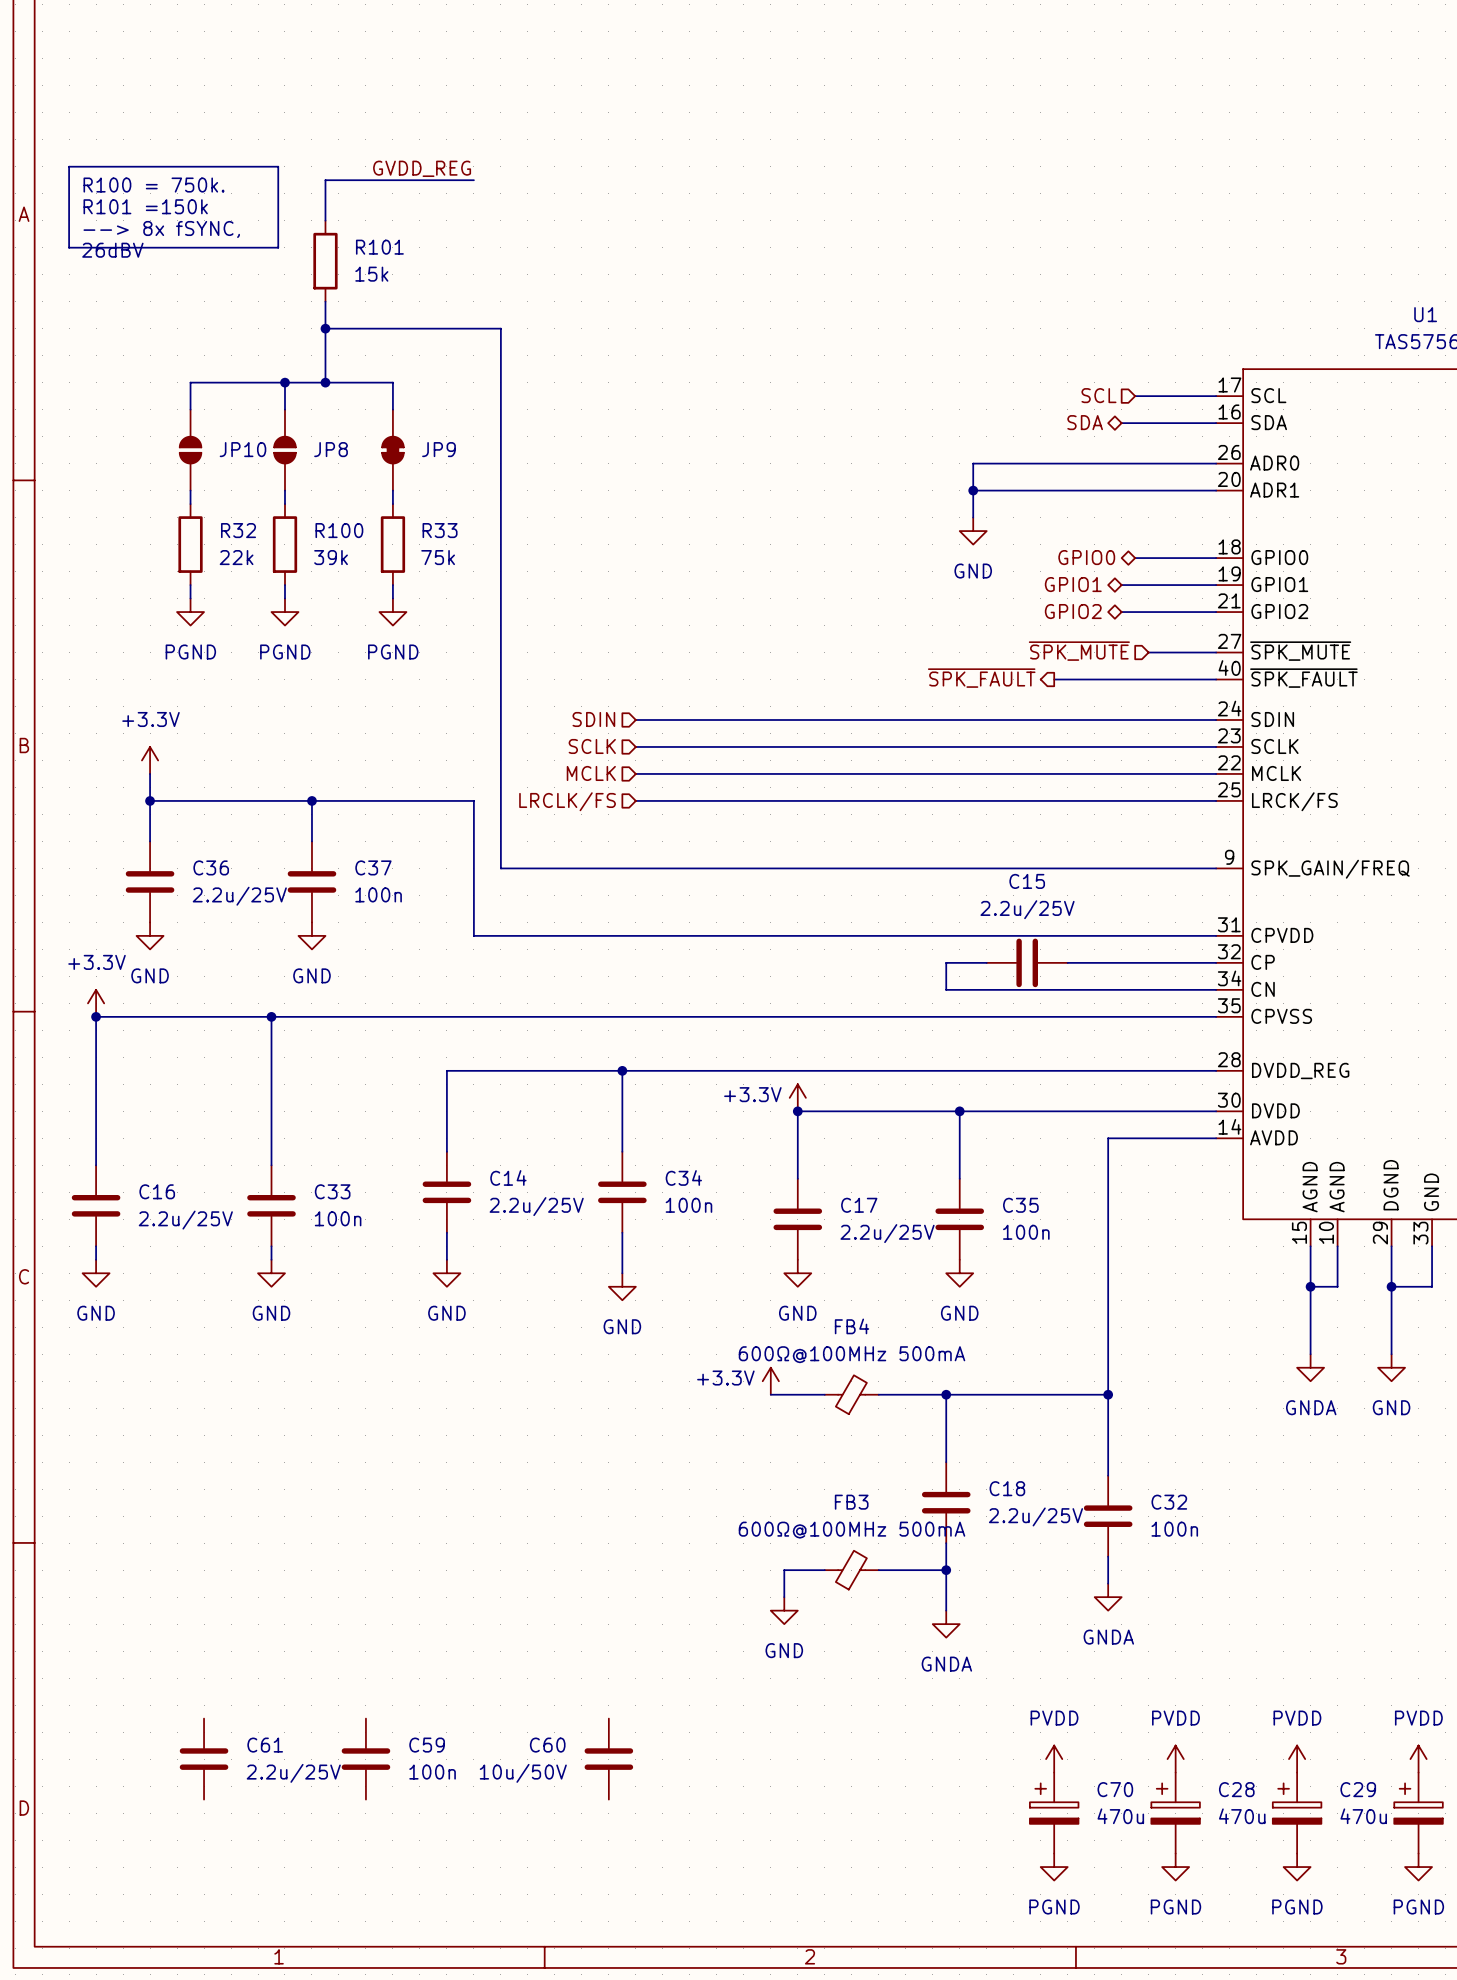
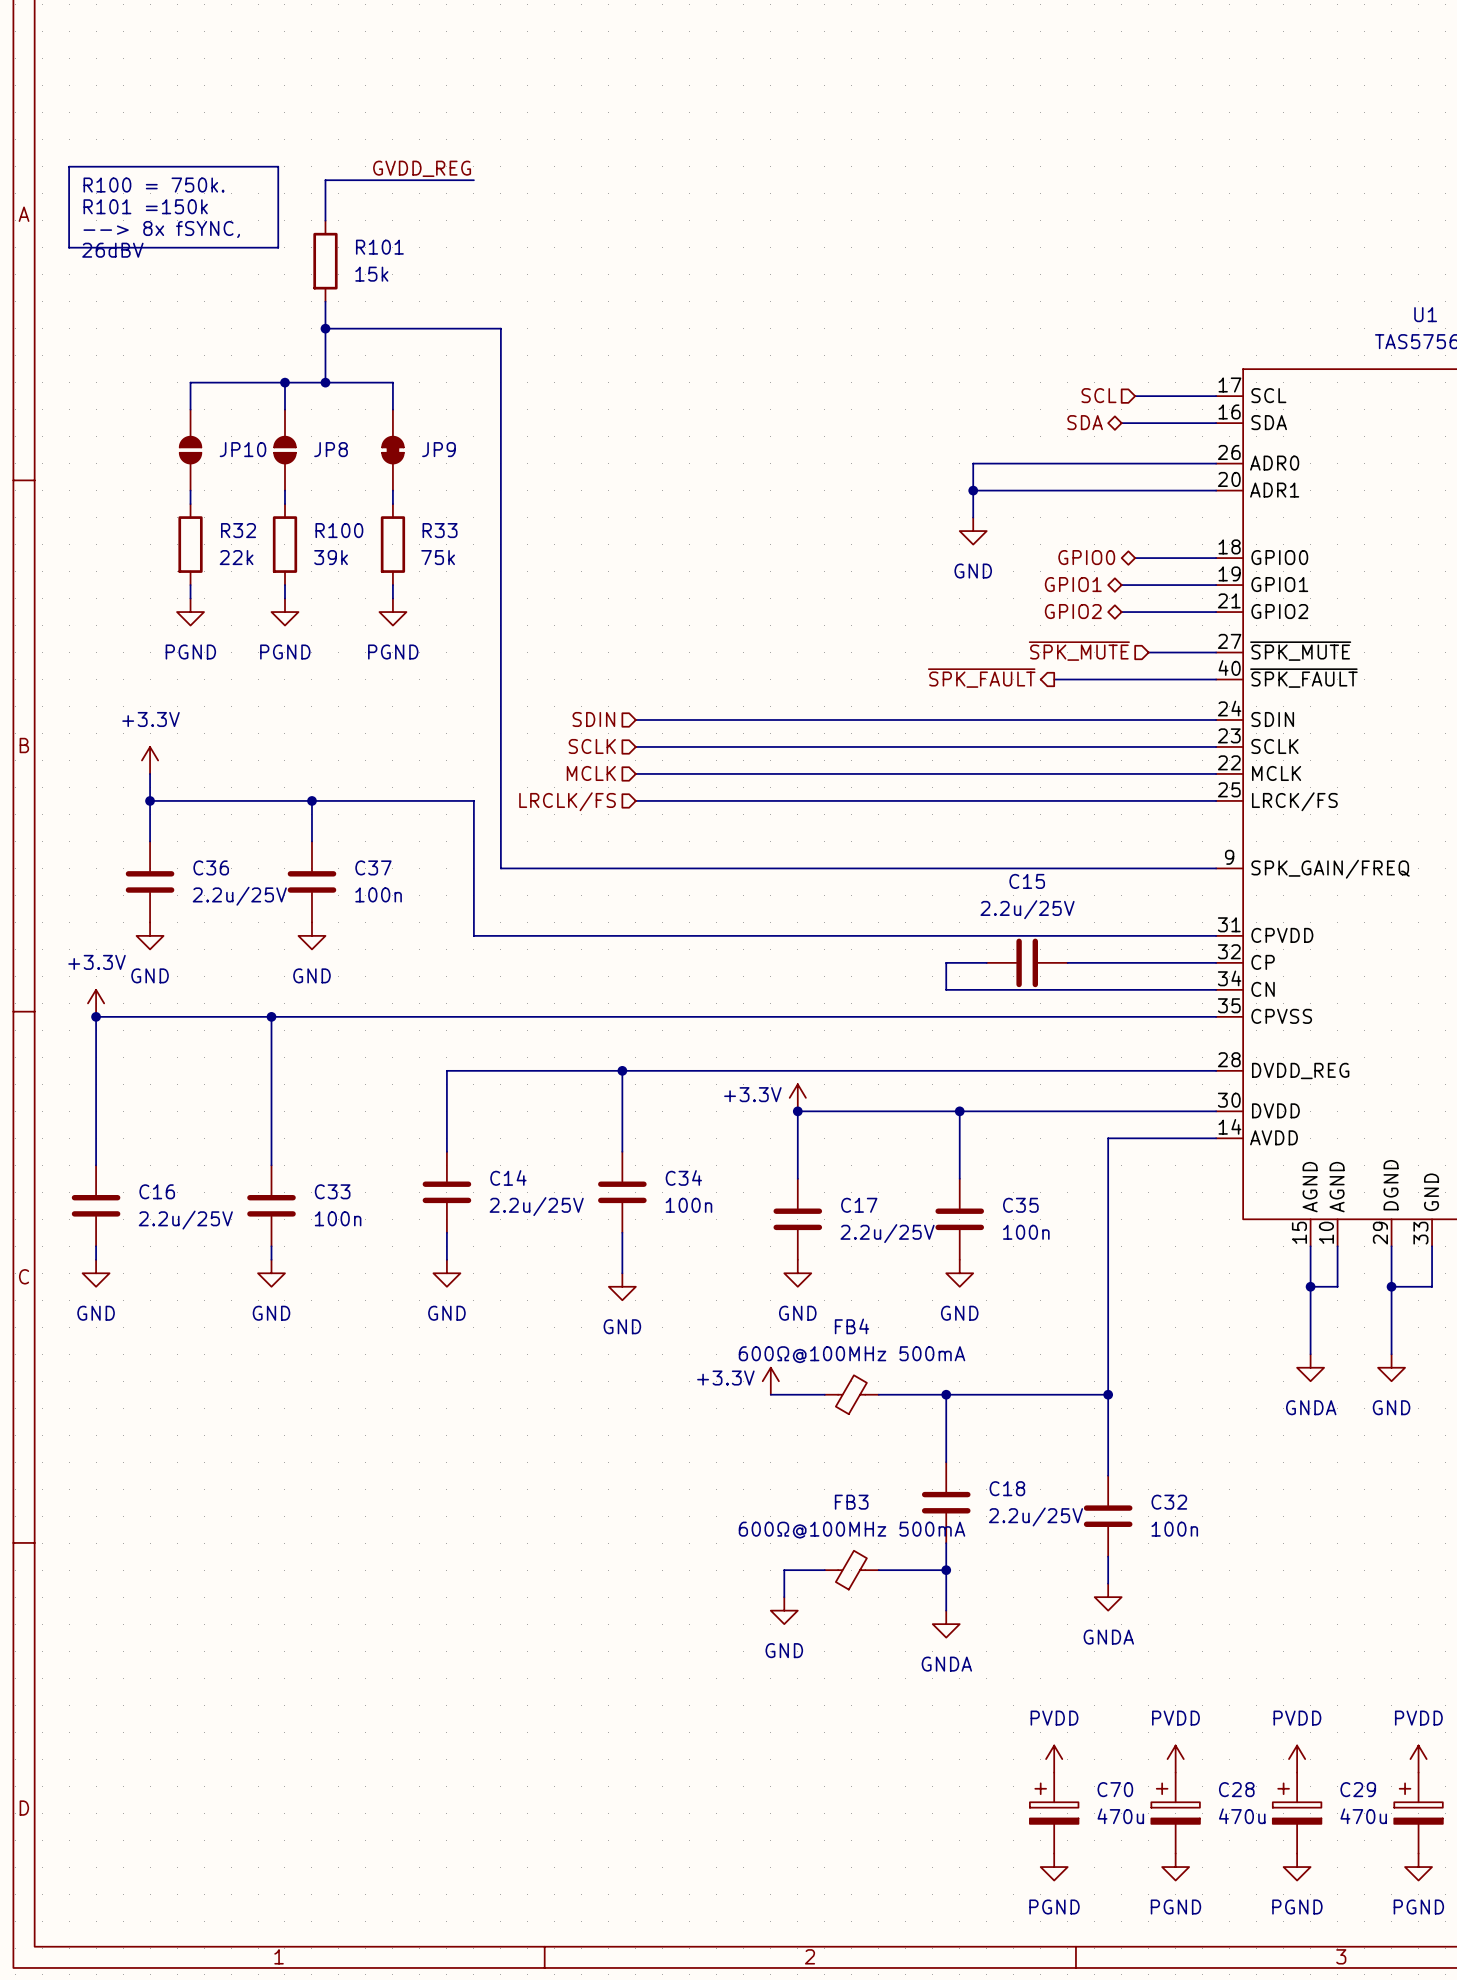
C61: 2.2u/25V (204, 1759) -> none
C59: 100n (365, 1759) -> none
C60: 10u/50V (608, 1759) -> none

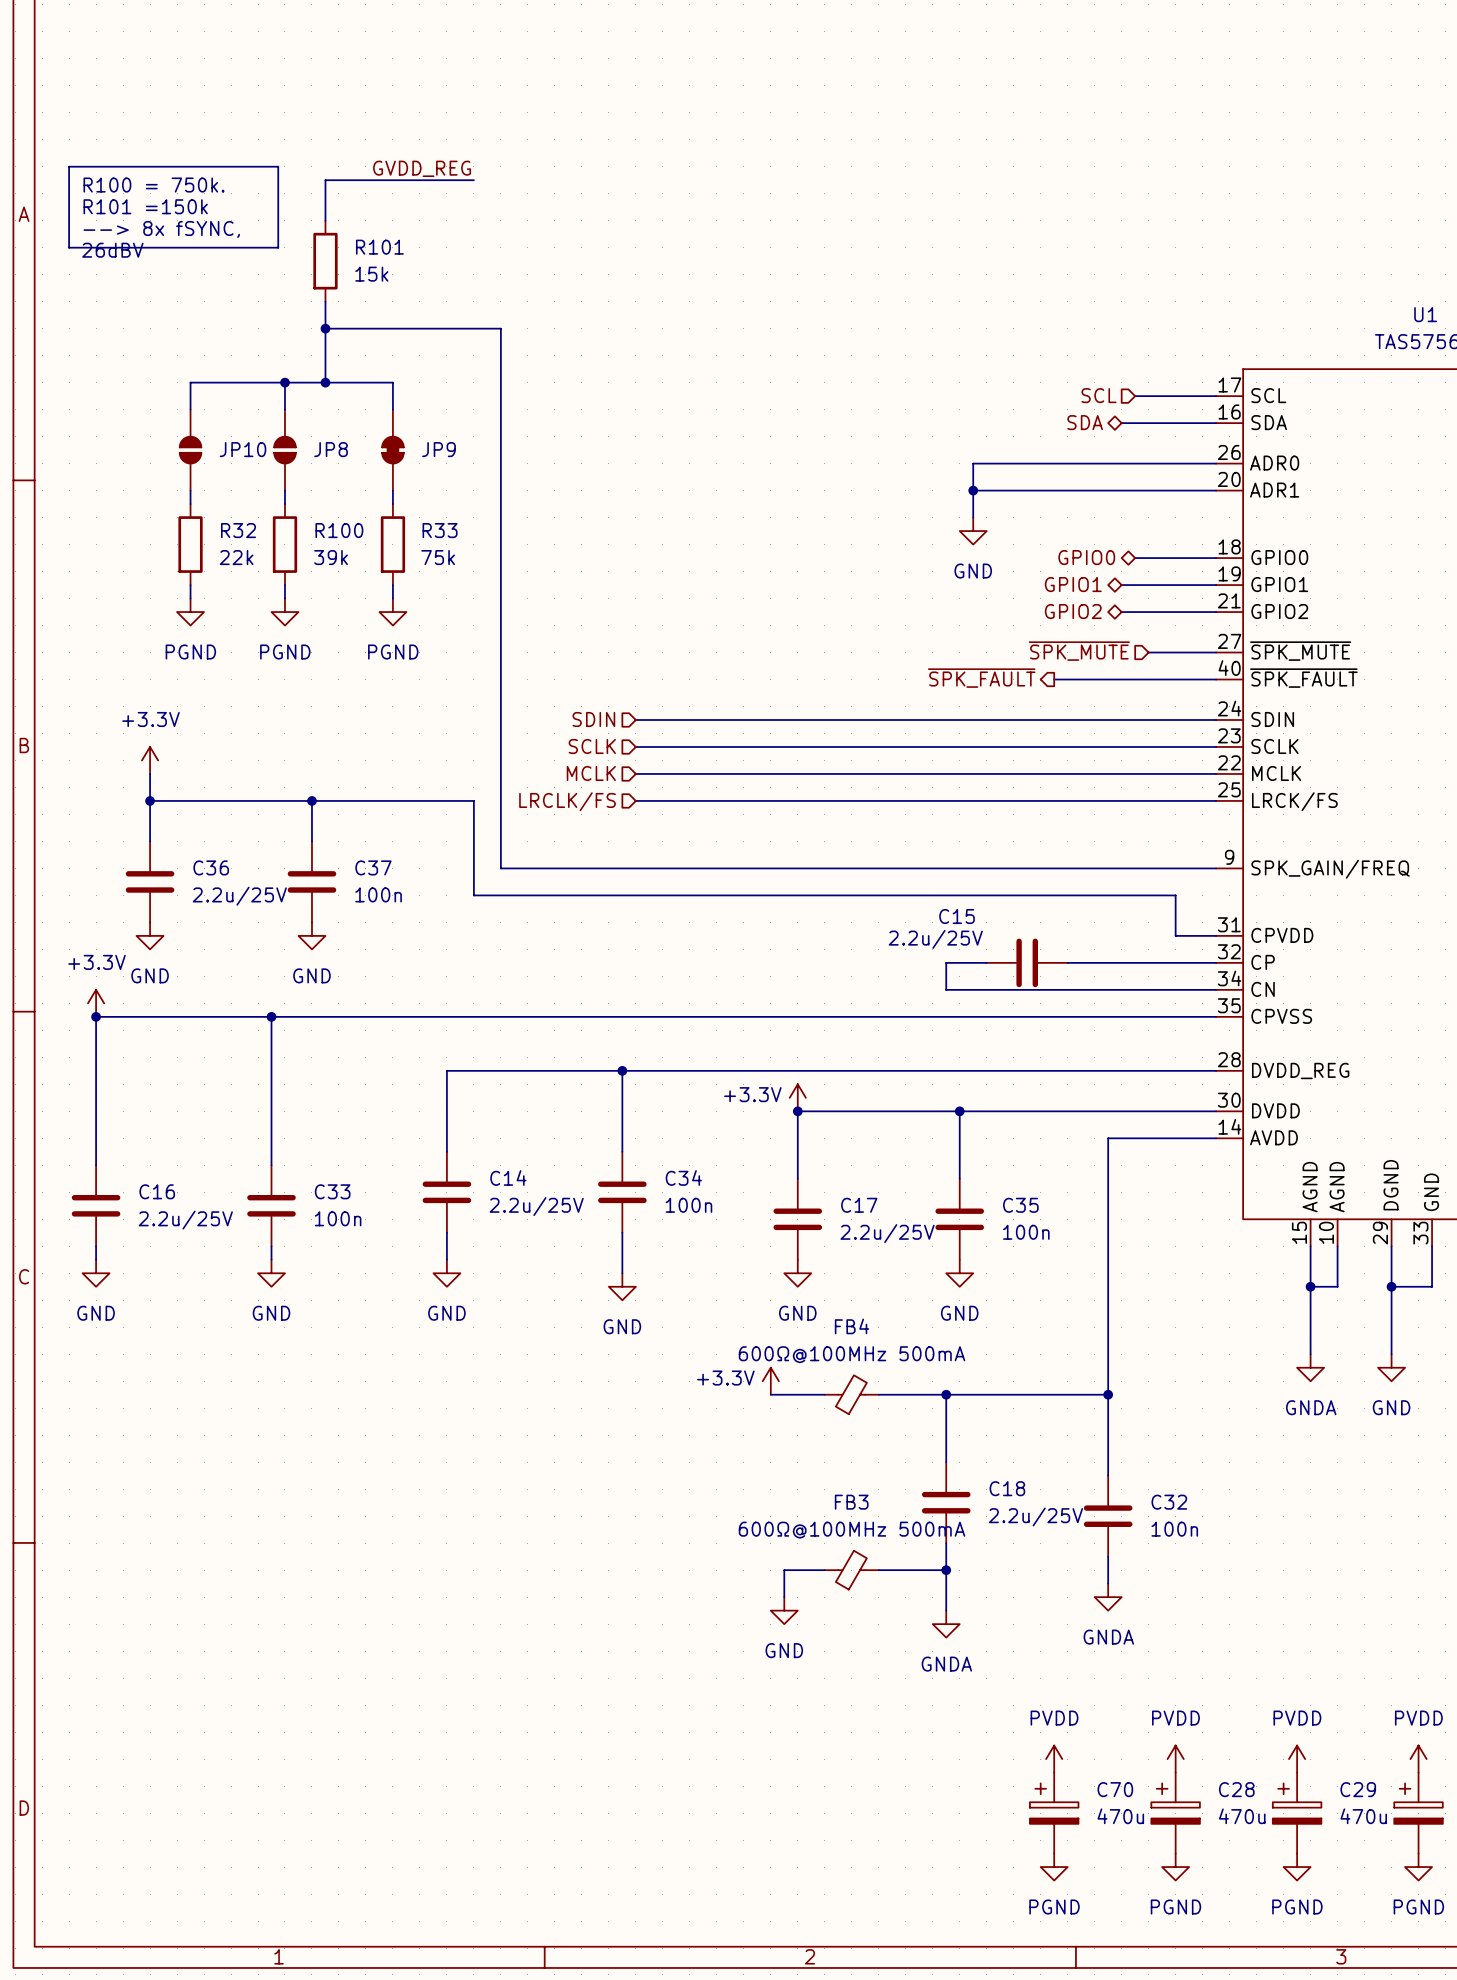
C15 name position: C15 (1027, 881) -> C15 (957, 916)
wire: (473, 895) (473, 935) (1175, 935) -> (473, 895) (1175, 895) (1175, 935)
C15 value position: 2.2u/25V (1027, 909) -> 2.2u/25V (935, 939)

